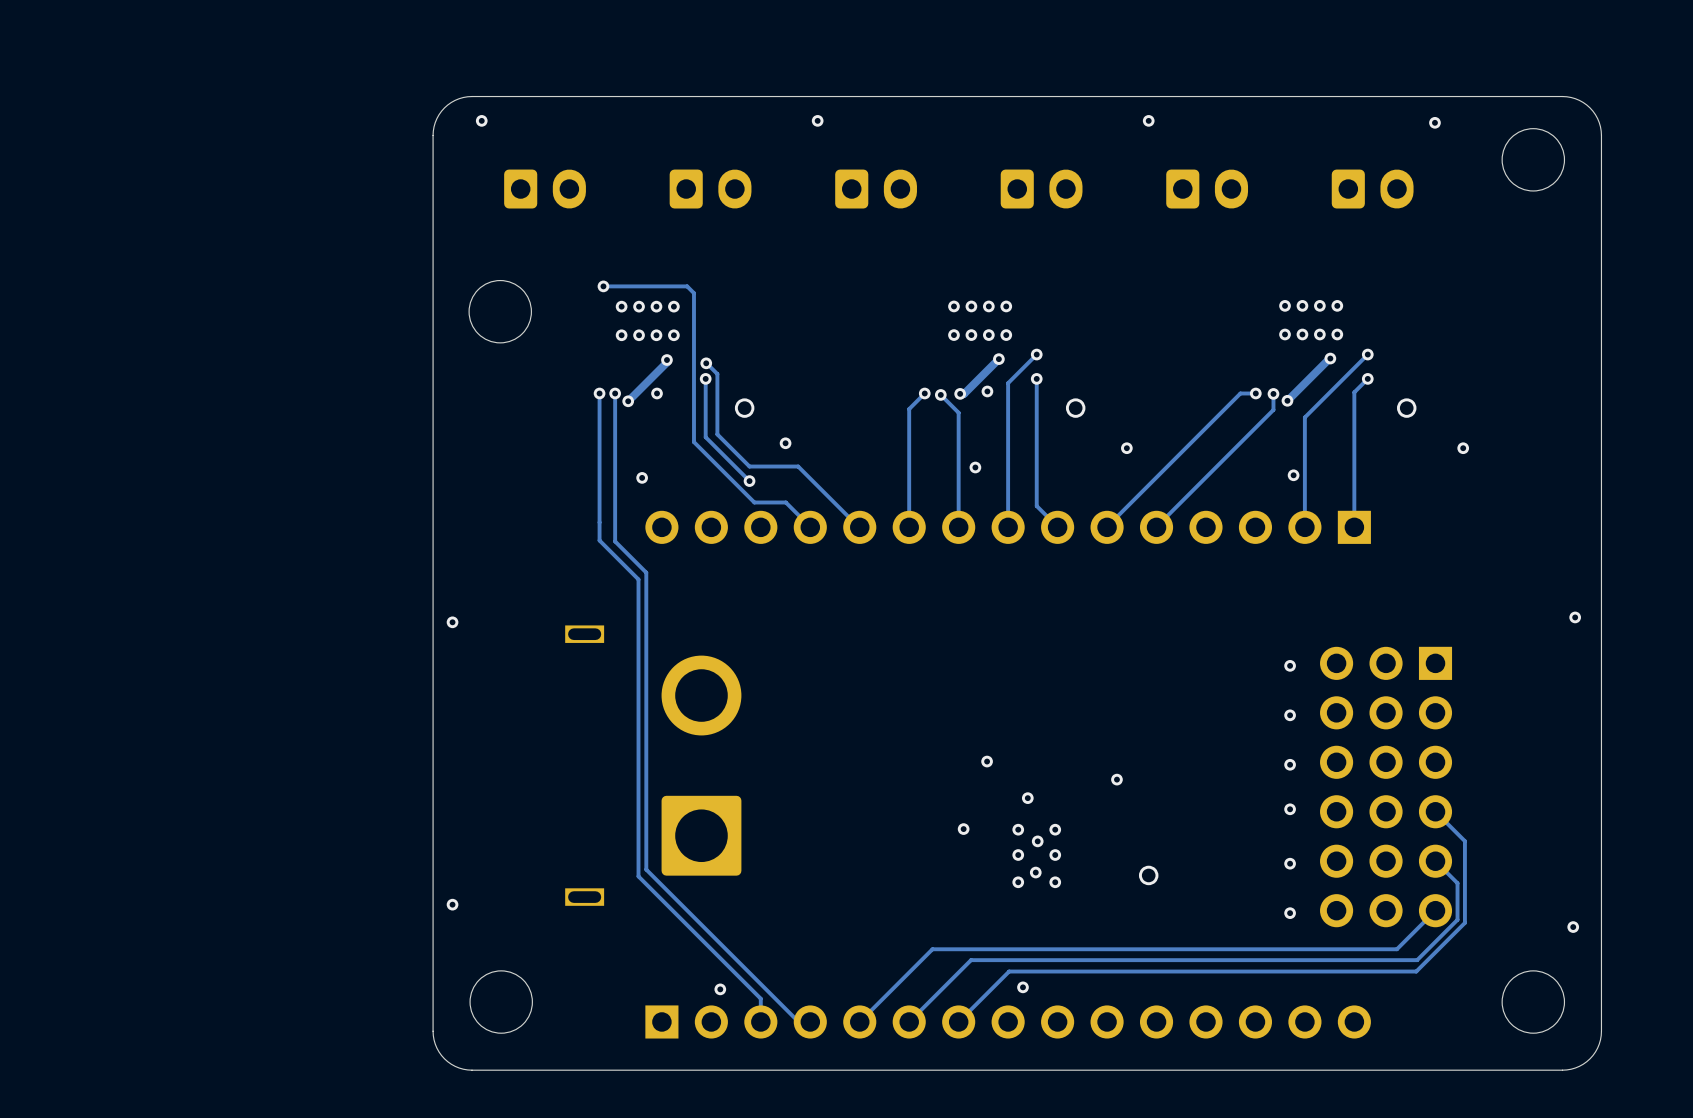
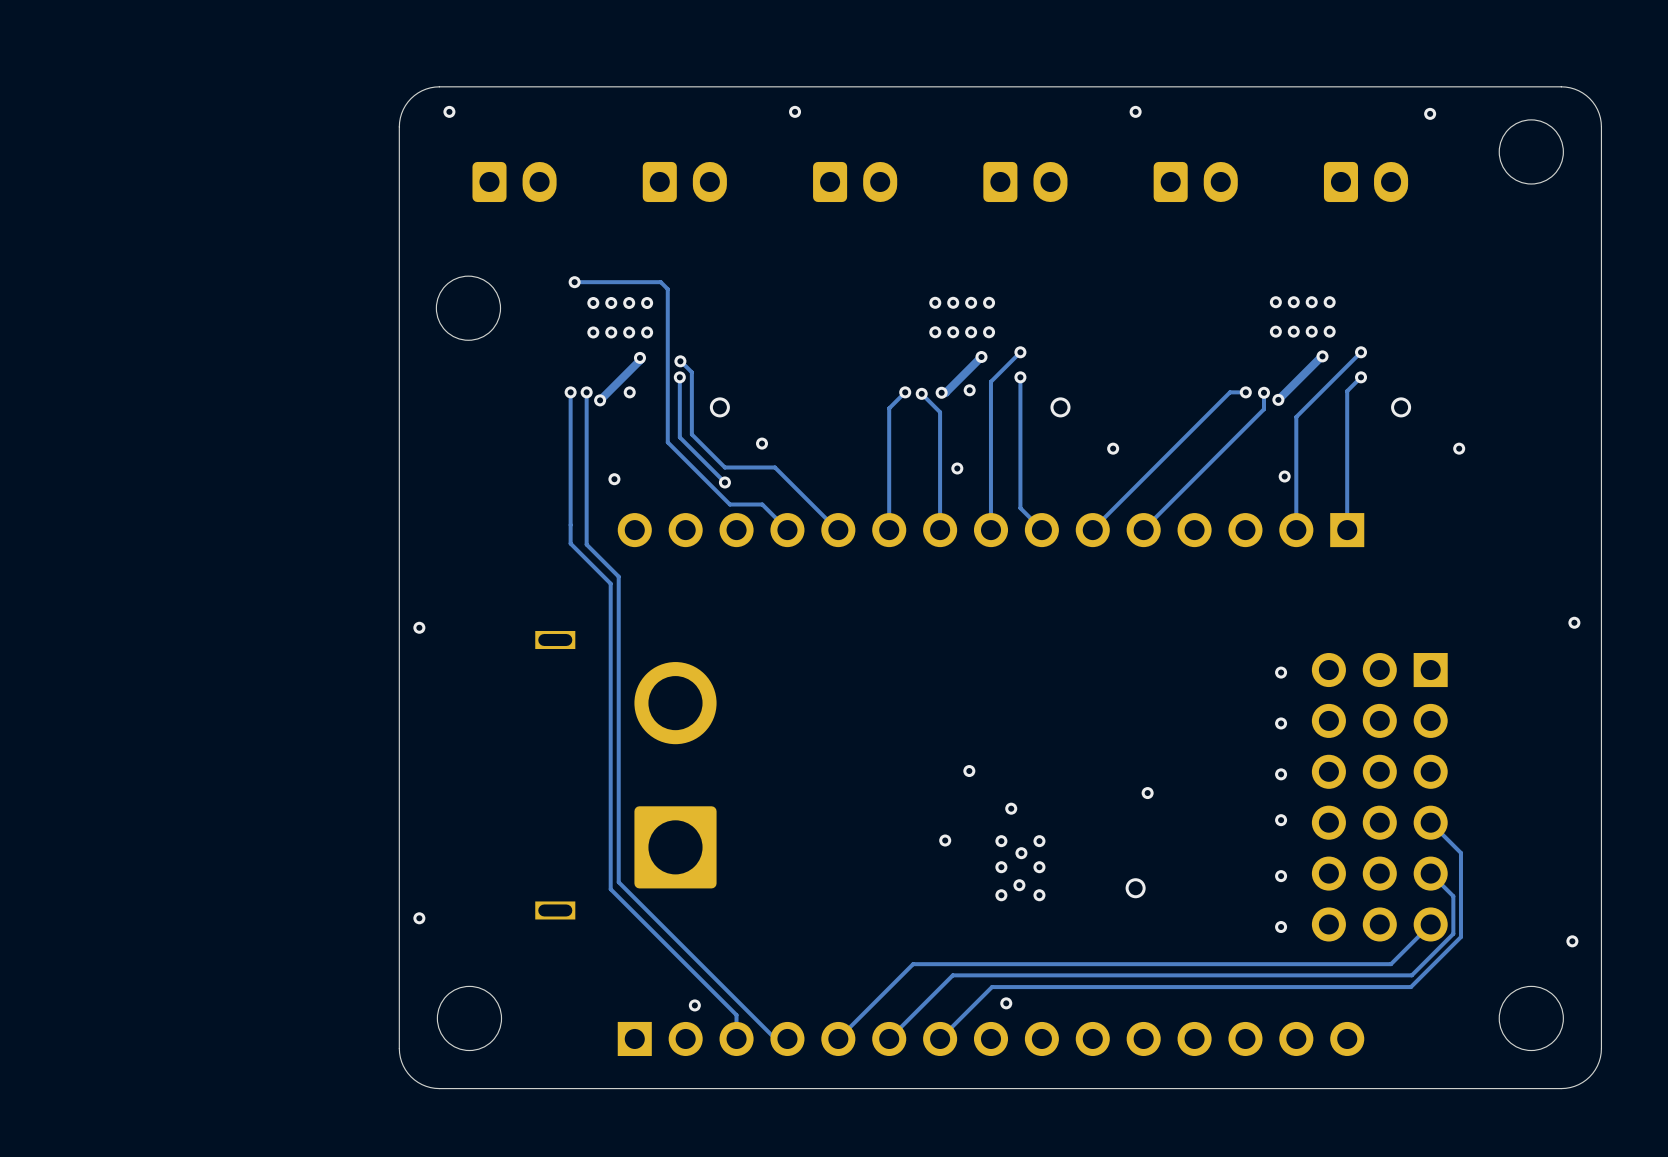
via position: (1116, 779) -> (1147, 793)

